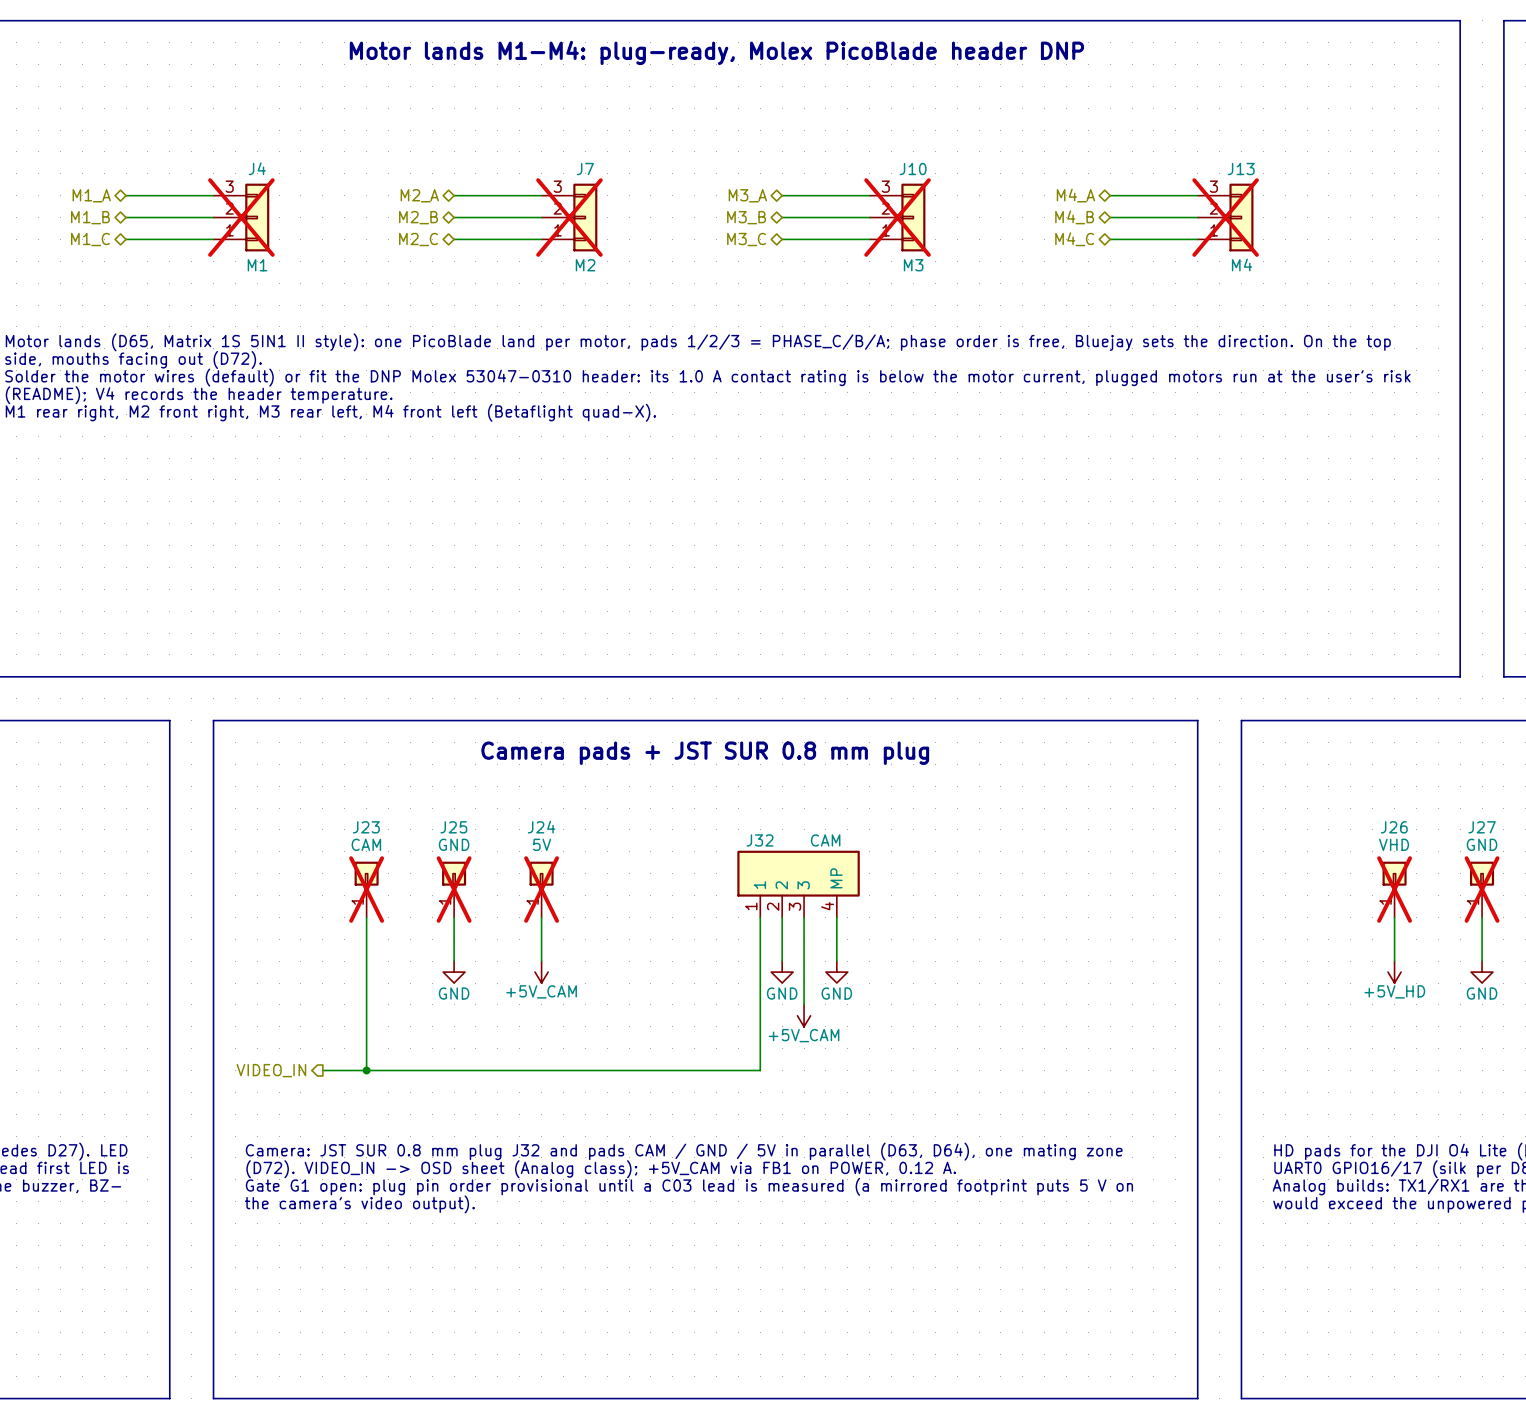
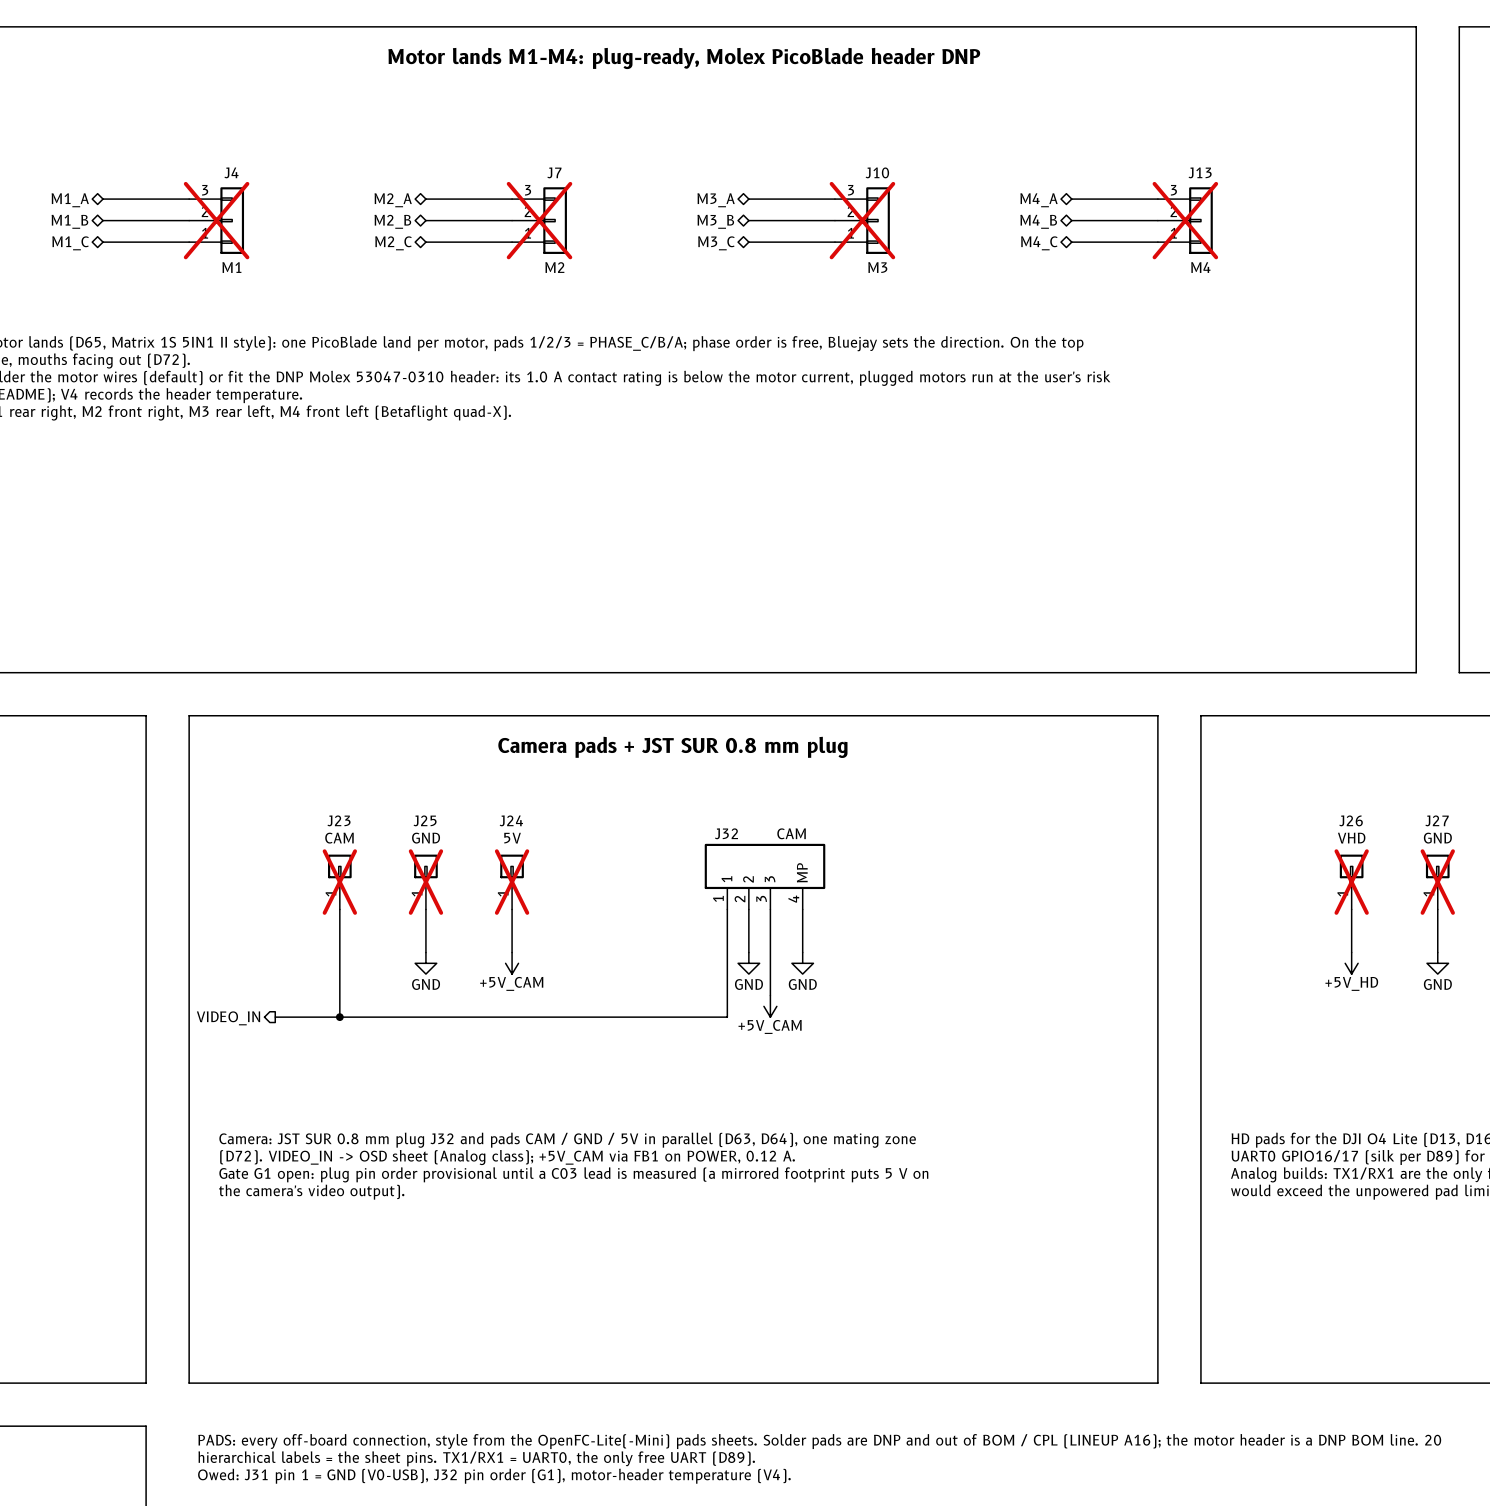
wire: (366, 1026) (366, 1070) -> none
wire: (760, 1026) (760, 1070) (322, 1070) -> (727, 1017) (275, 1017)
hierarchical label position: VIDEO_IN (271, 1070) -> VIDEO_IN (228, 1018)
junction position: (366, 1070) -> (339, 1017)

